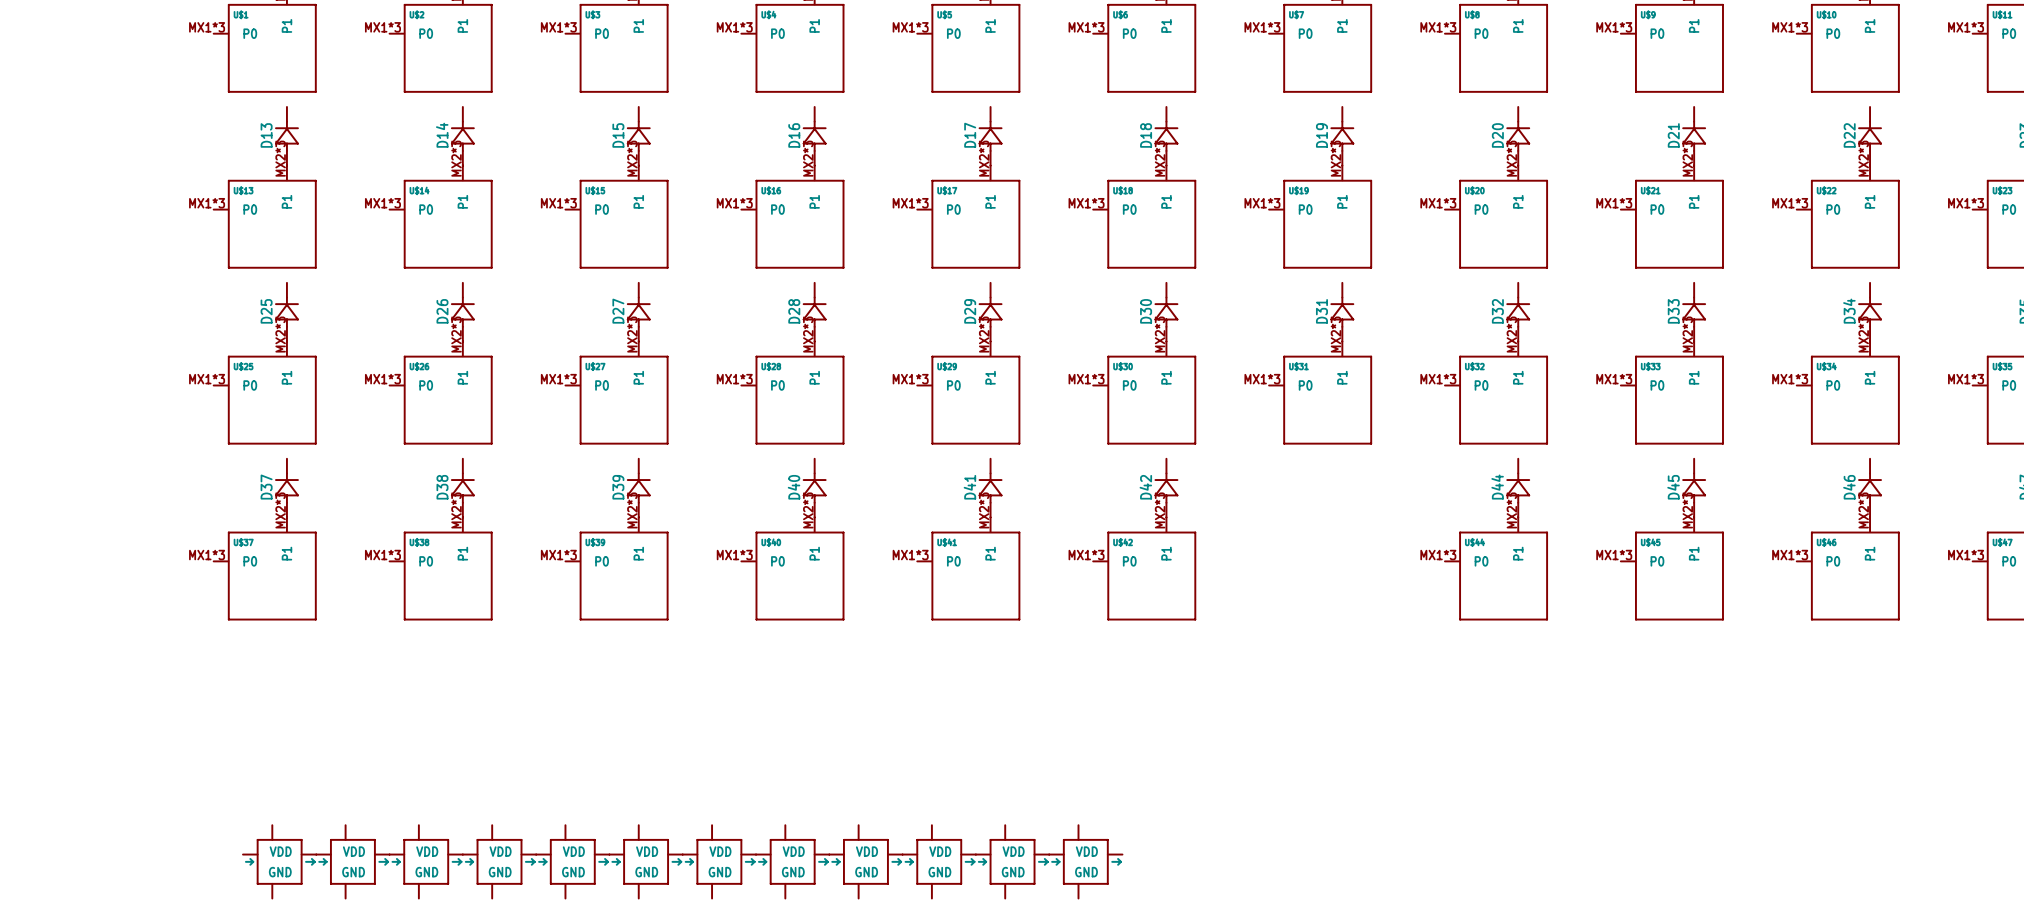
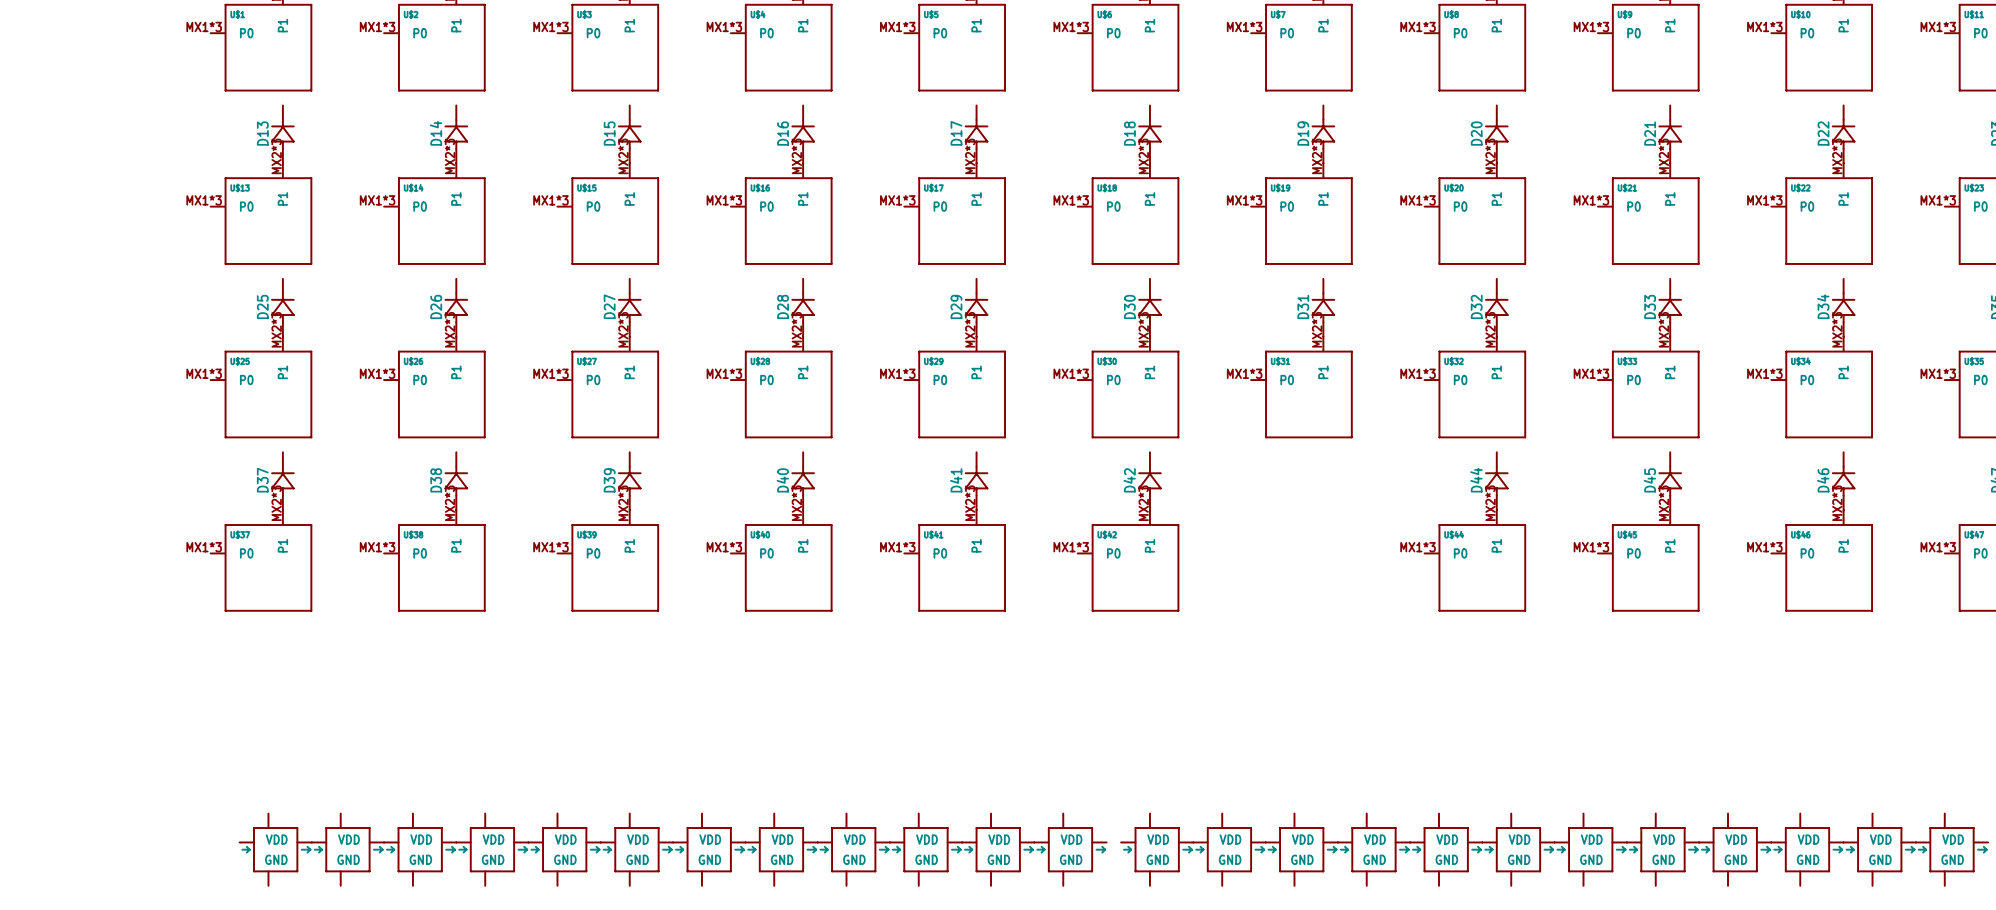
part: none -> (1157, 849)
part: none -> (1229, 849)
part: none -> (1301, 849)
part: none -> (1373, 849)
part: none -> (1446, 849)
part: none -> (1518, 849)
part: none -> (1590, 849)
part: none -> (1662, 849)
part: none -> (1735, 849)
part: none -> (1807, 849)
part: none -> (1879, 849)
part: none -> (1951, 849)

